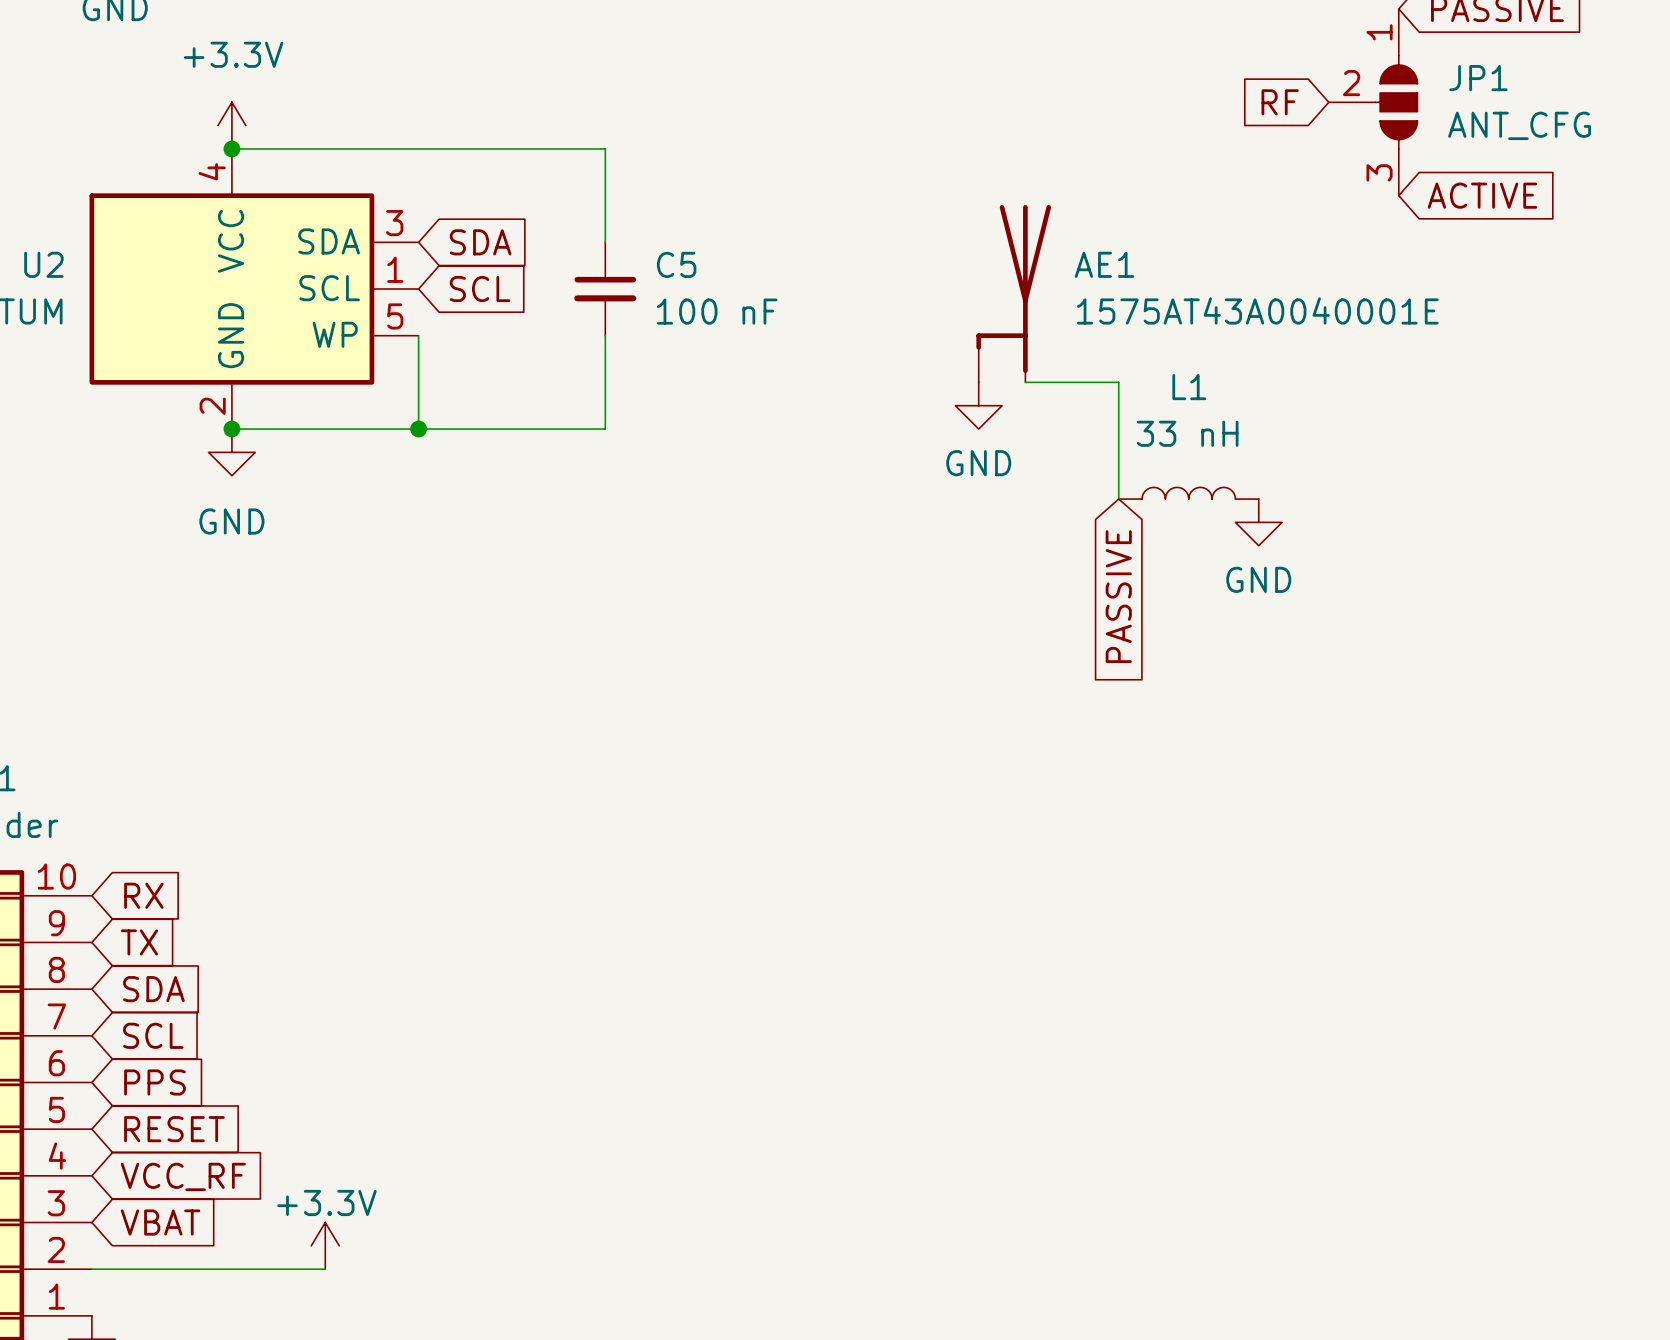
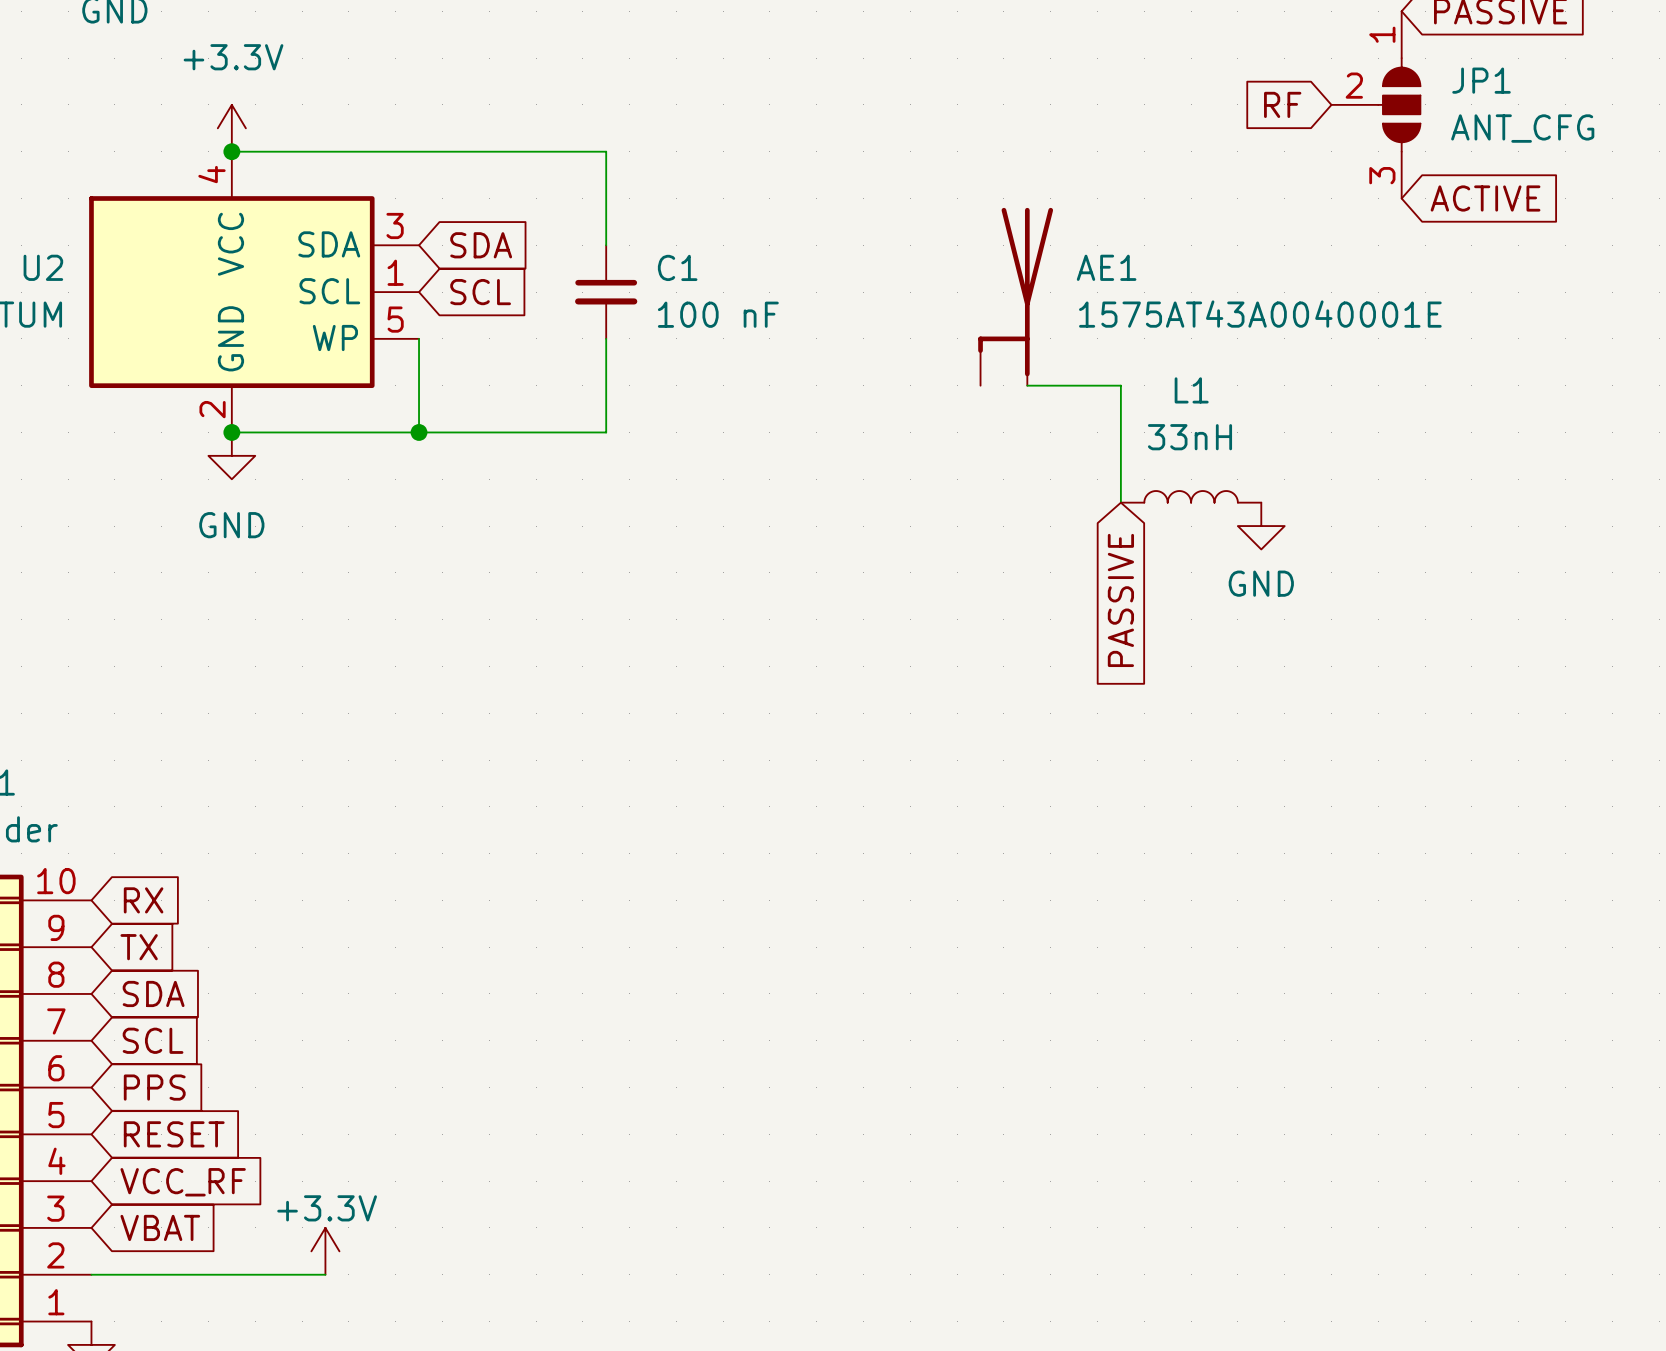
C5 name: C5 (676, 264) -> C1 (677, 267)
power symbol: GND (978, 405) -> none
L1 value: 33 nH (1187, 433) -> 33nH (1189, 437)

